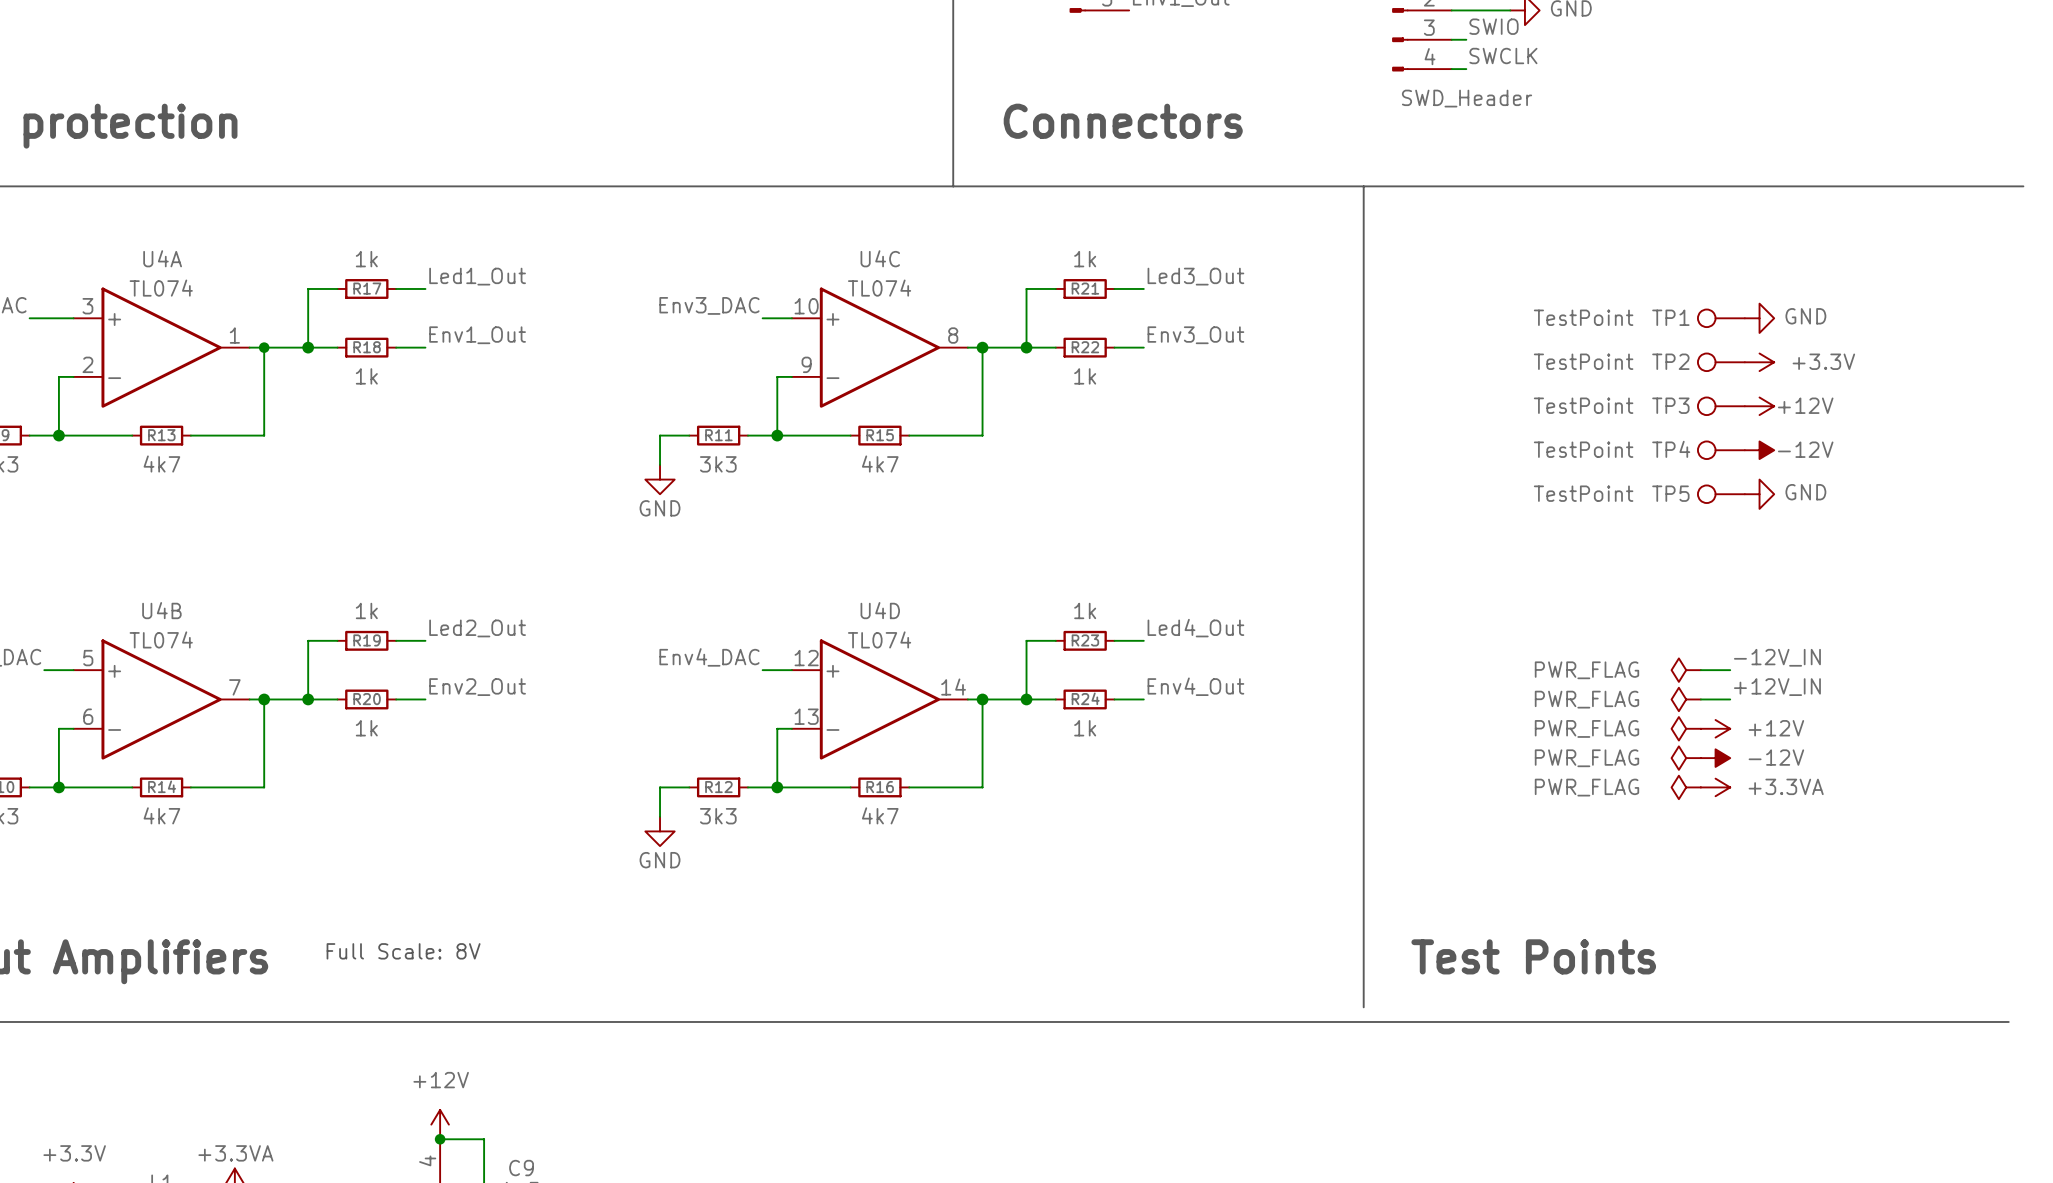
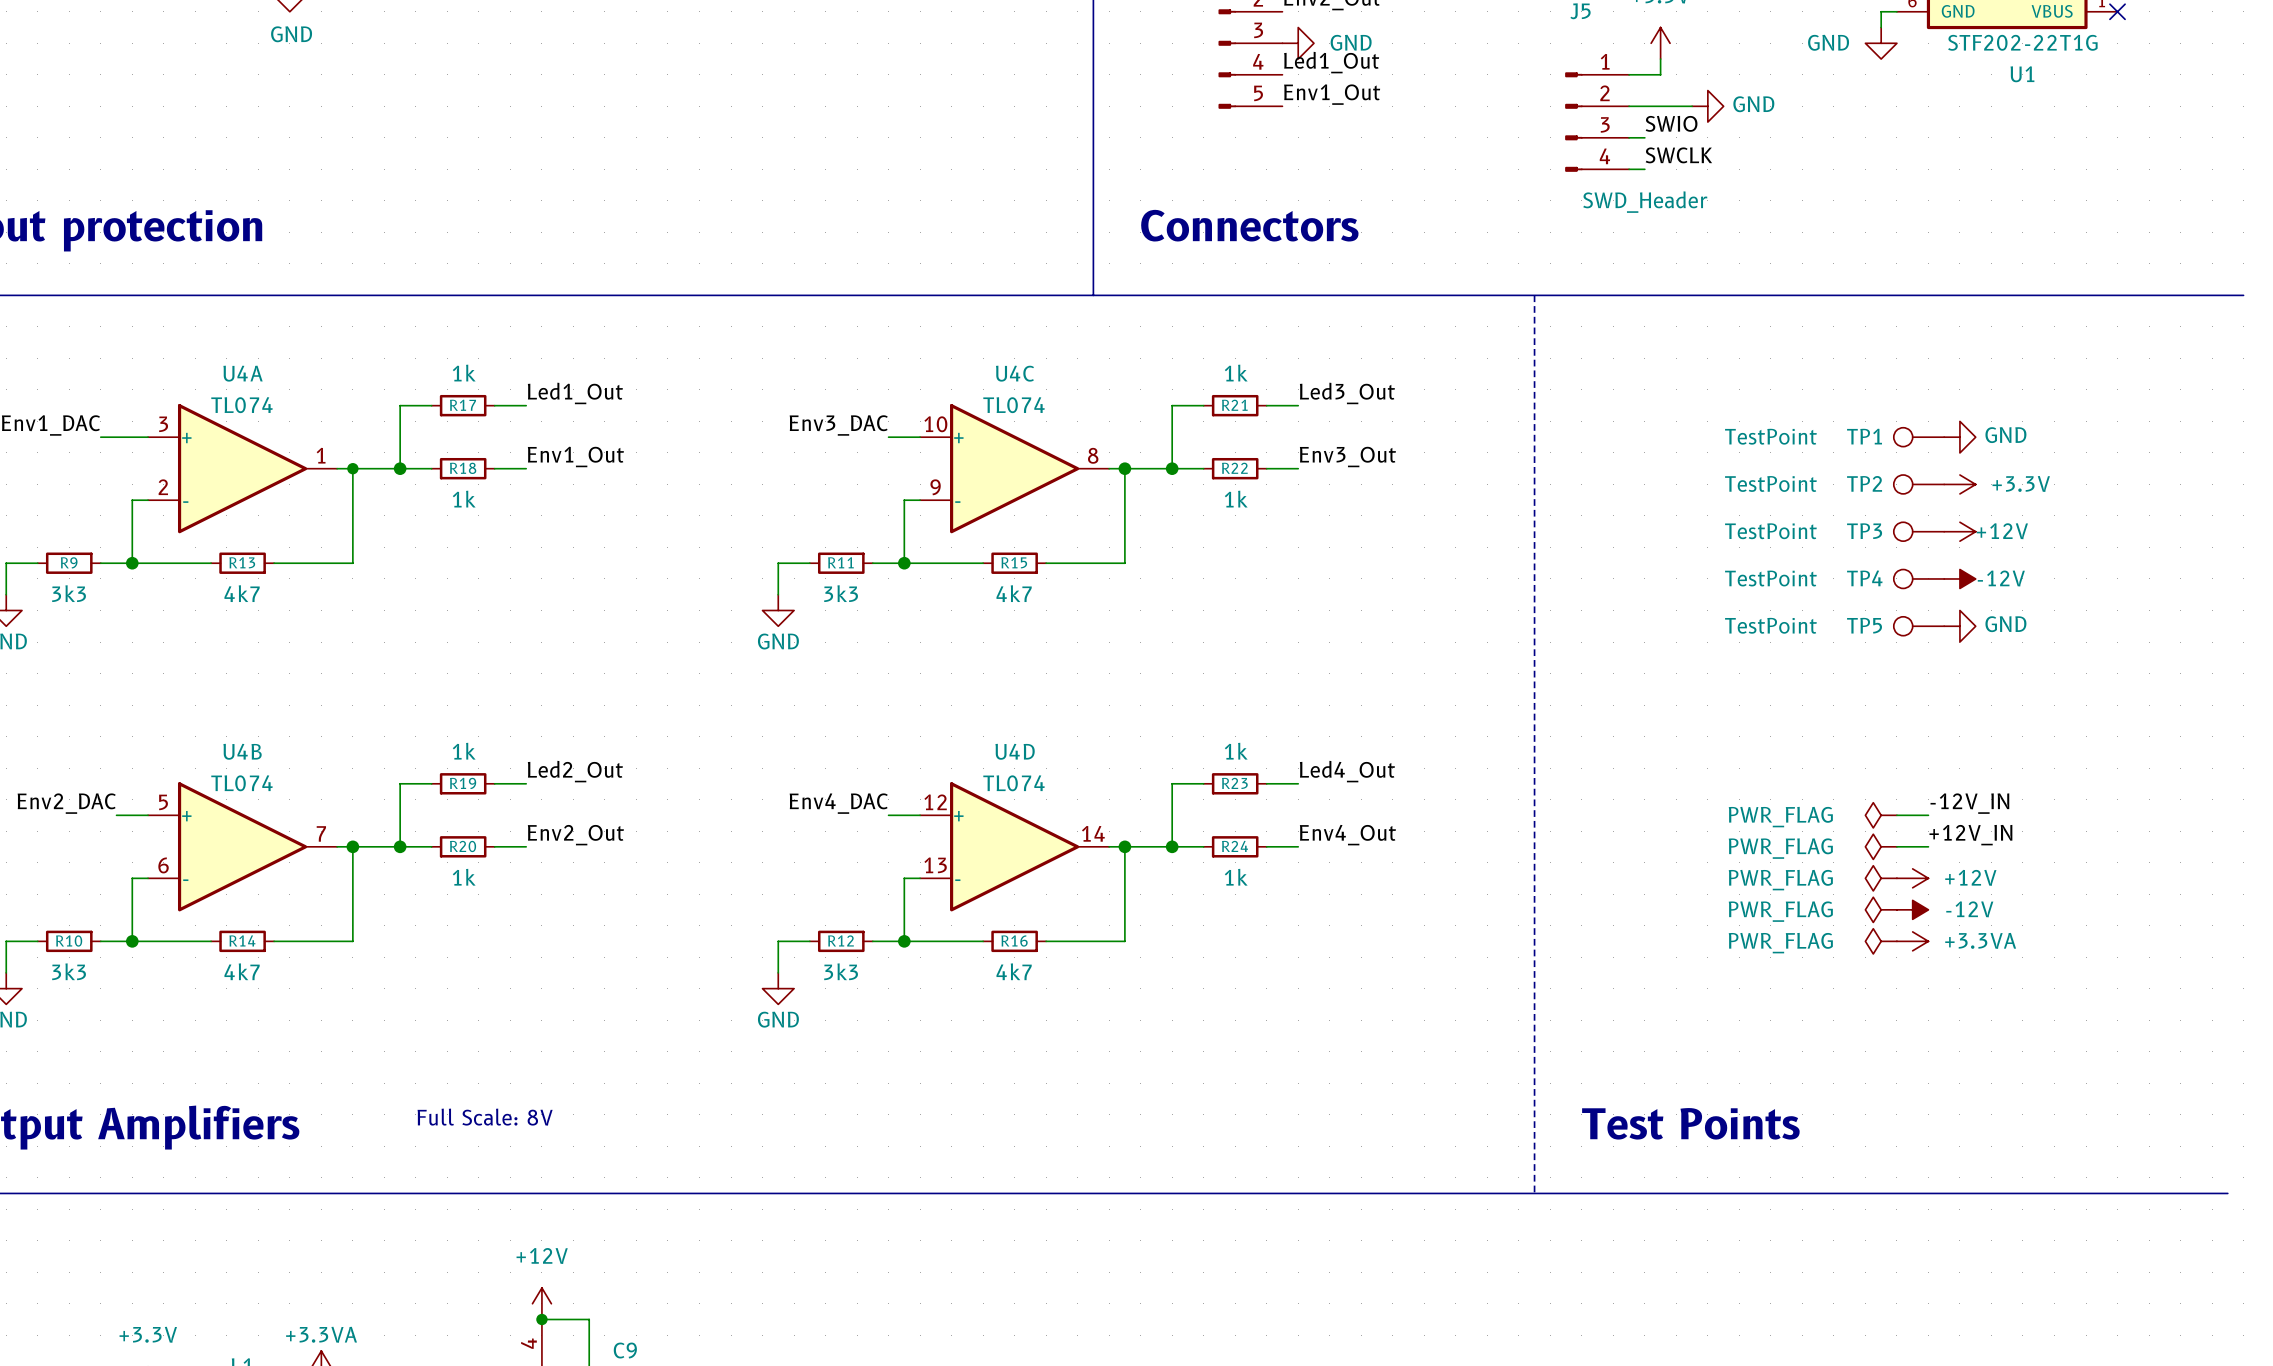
line: (1363, 186) (1363, 1007) -> (1534, 295) (1534, 1193)

